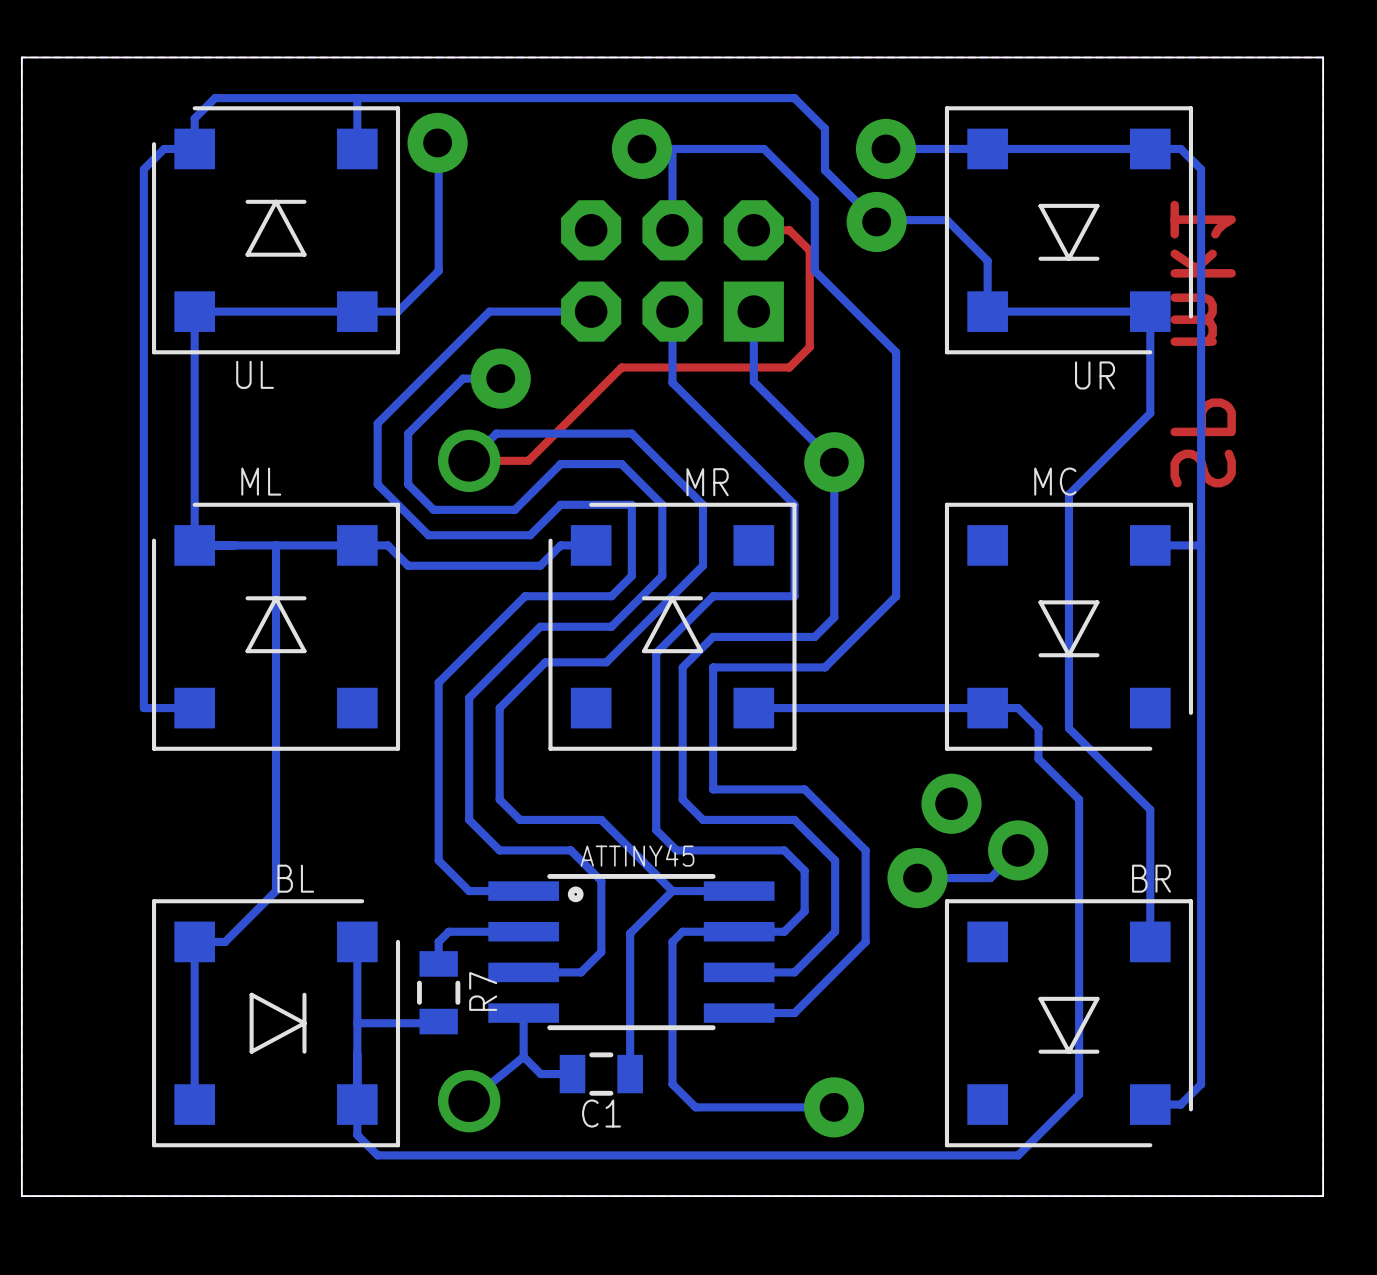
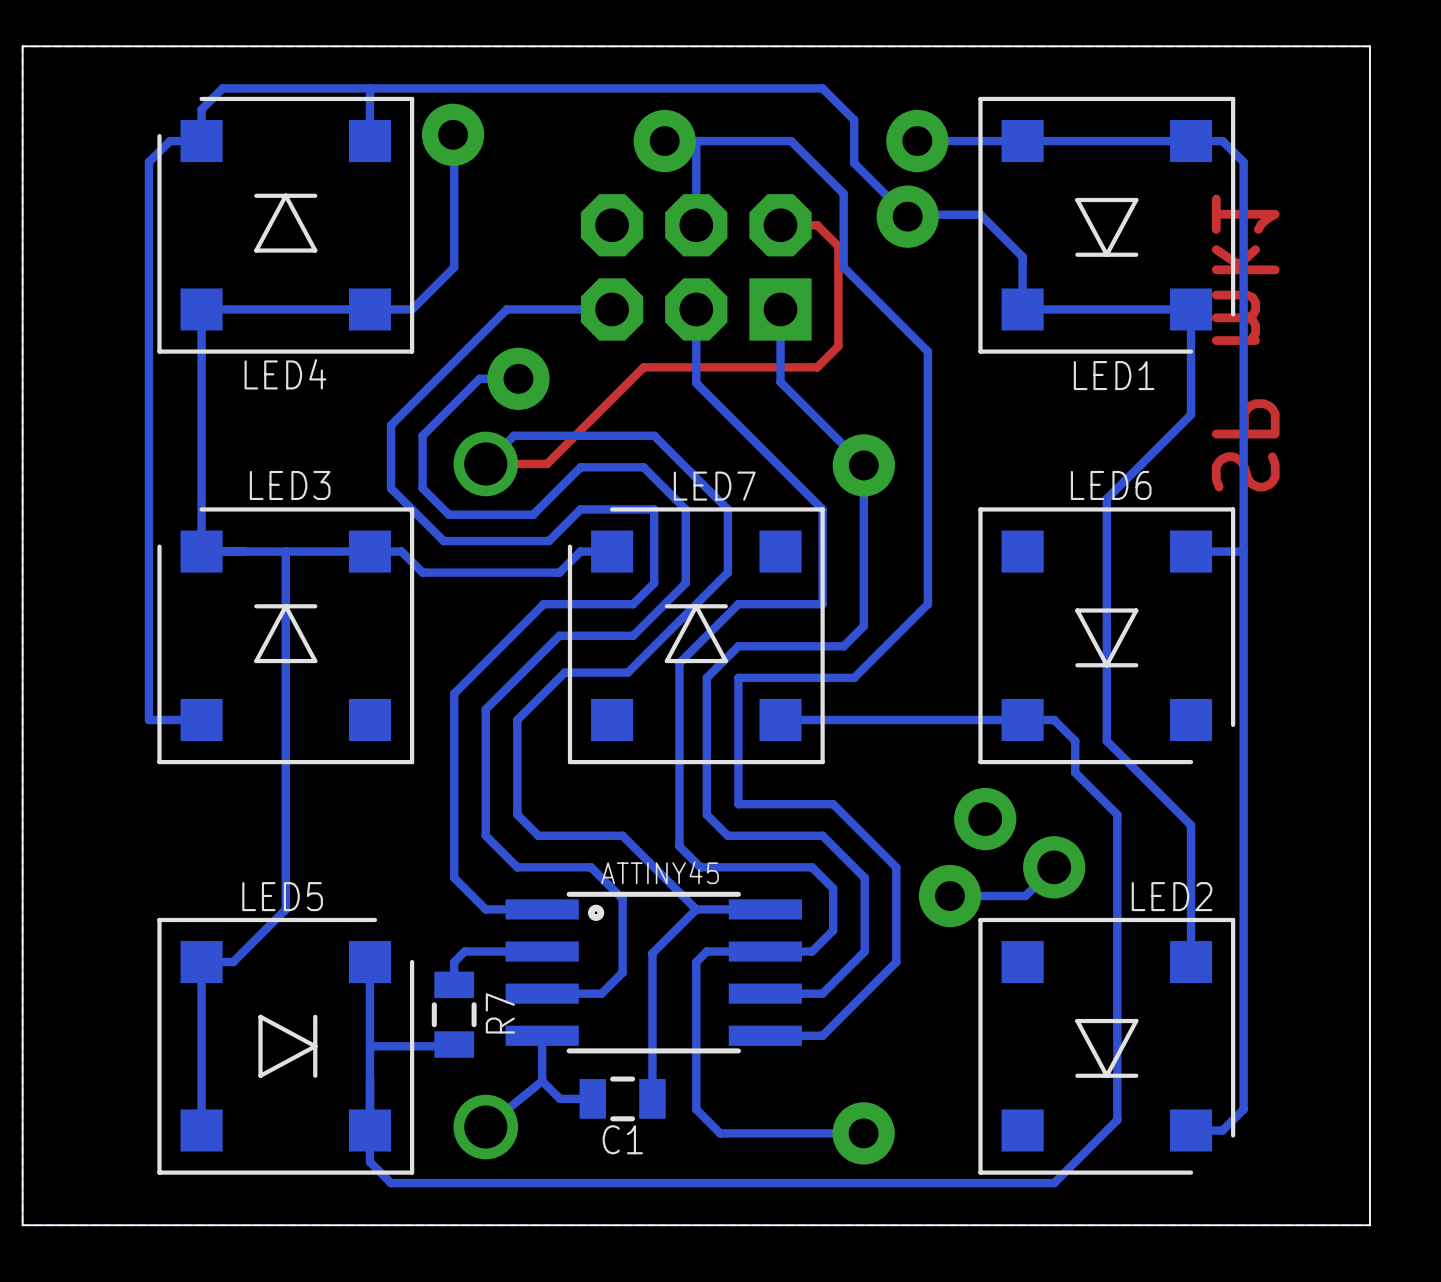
UL name: UL (255, 374) -> LED4 (285, 374)
UR name: UR (1095, 375) -> LED1 (1114, 375)
ML name: ML (261, 481) -> LED3 (290, 485)
MC name: MC (1055, 481) -> LED6 (1111, 485)
MR name: MR (707, 482) -> LED7 (714, 486)
BL name: BL (295, 878) -> LED5 (282, 896)
BR name: BR (1151, 878) -> LED2 (1172, 896)

